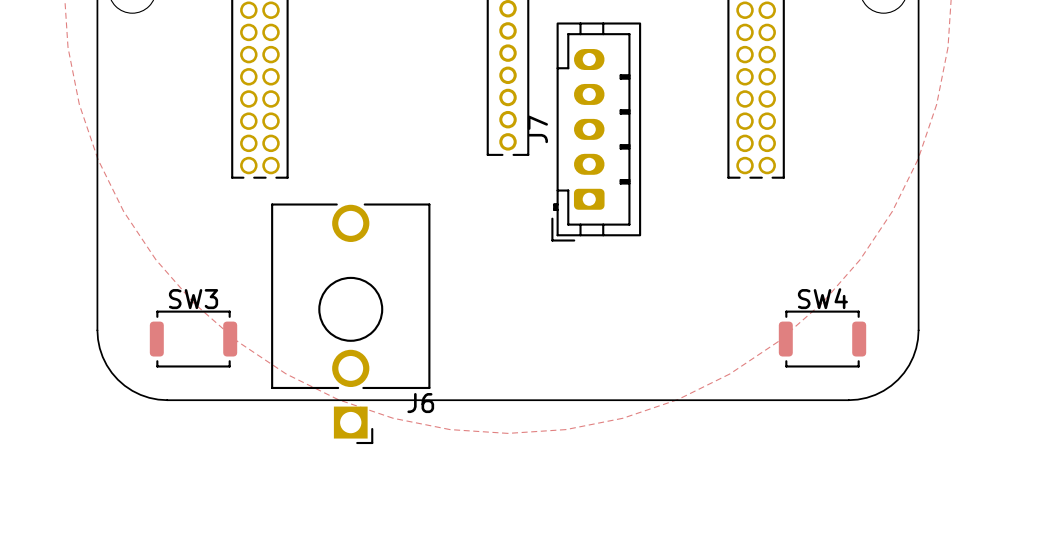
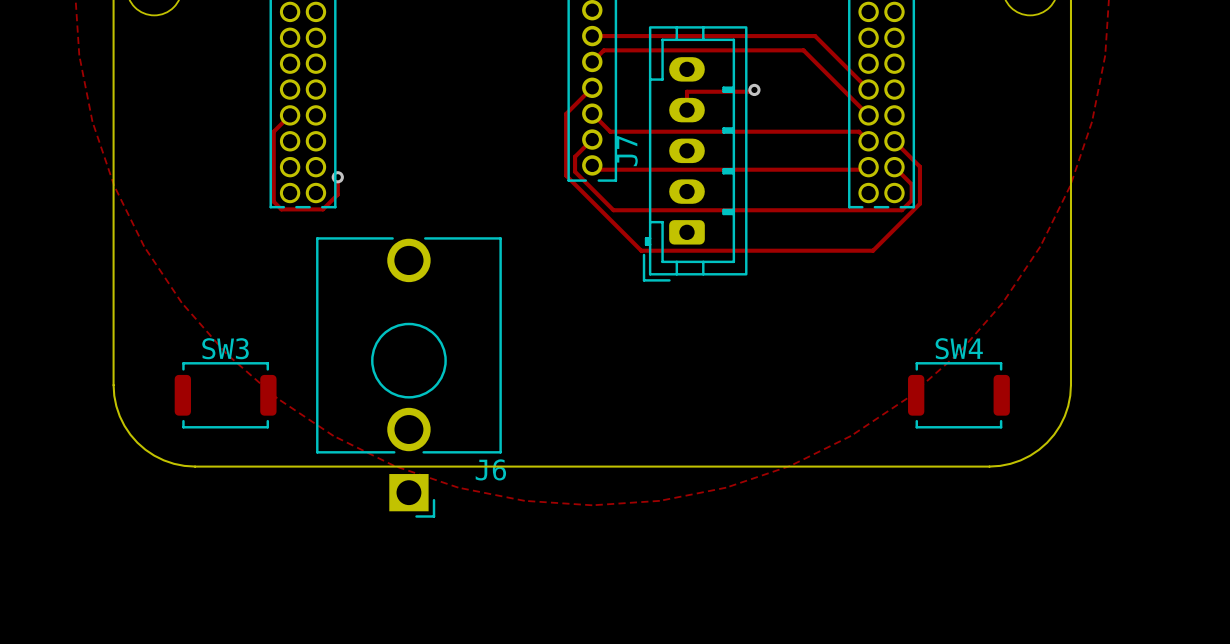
track: none -> (592, 36) (815, 36) (868, 89)
track: none -> (592, 61) (603, 50) (803, 50) (868, 115)
track: none -> (592, 87) (566, 113) (566, 175) (641, 250) (873, 250) (919, 203) (919, 166) (894, 141)
track: none -> (754, 89) (752, 91) (687, 91) (687, 110)
via: none -> (754, 89)
track: none -> (592, 113) (610, 131) (859, 131) (868, 141)
track: none -> (290, 115) (273, 131) (273, 201) (281, 209) (322, 209) (337, 194) (337, 177)
track: none -> (592, 139) (575, 156) (575, 171) (613, 210) (901, 210) (911, 200) (911, 184) (894, 167)
track: none -> (592, 165) (596, 169) (866, 169) (868, 167)
via: none -> (337, 177)

